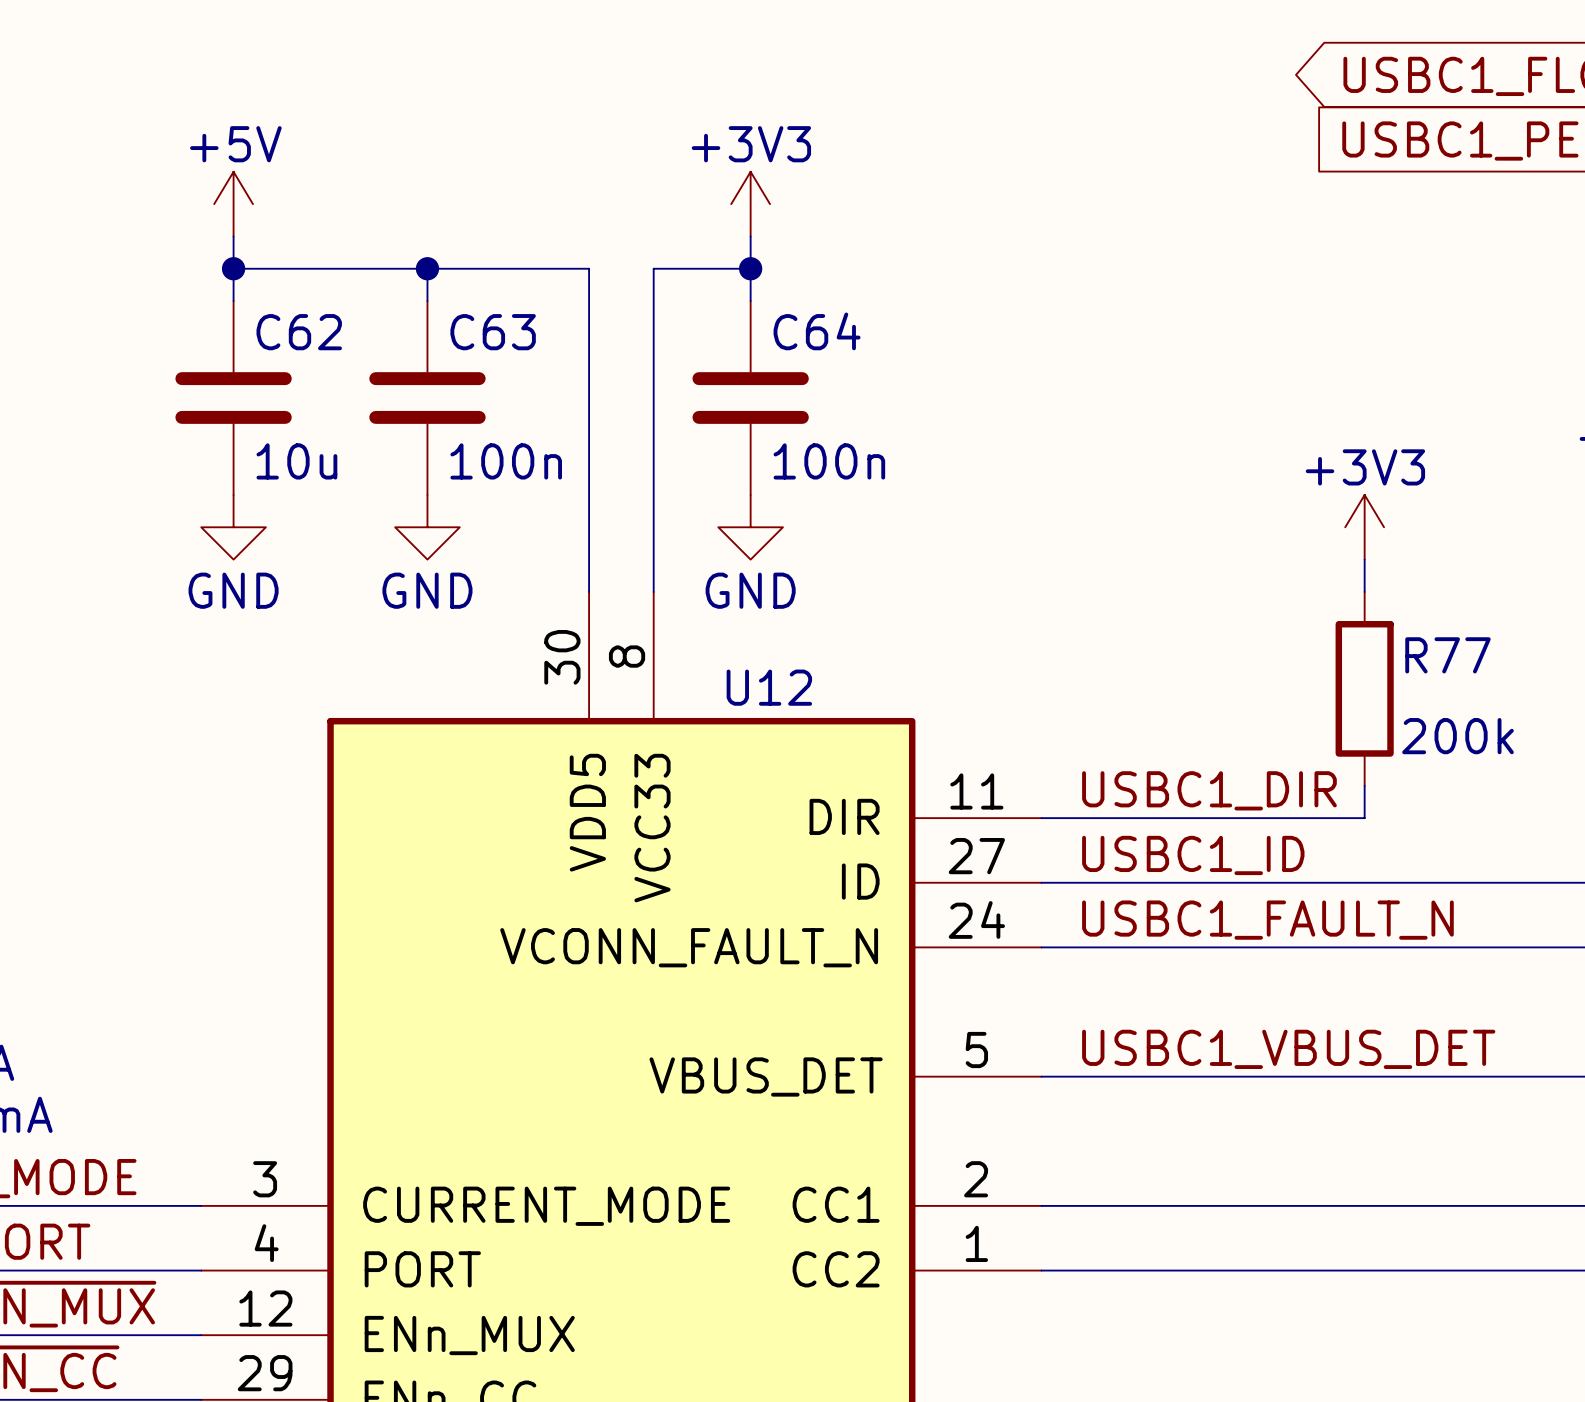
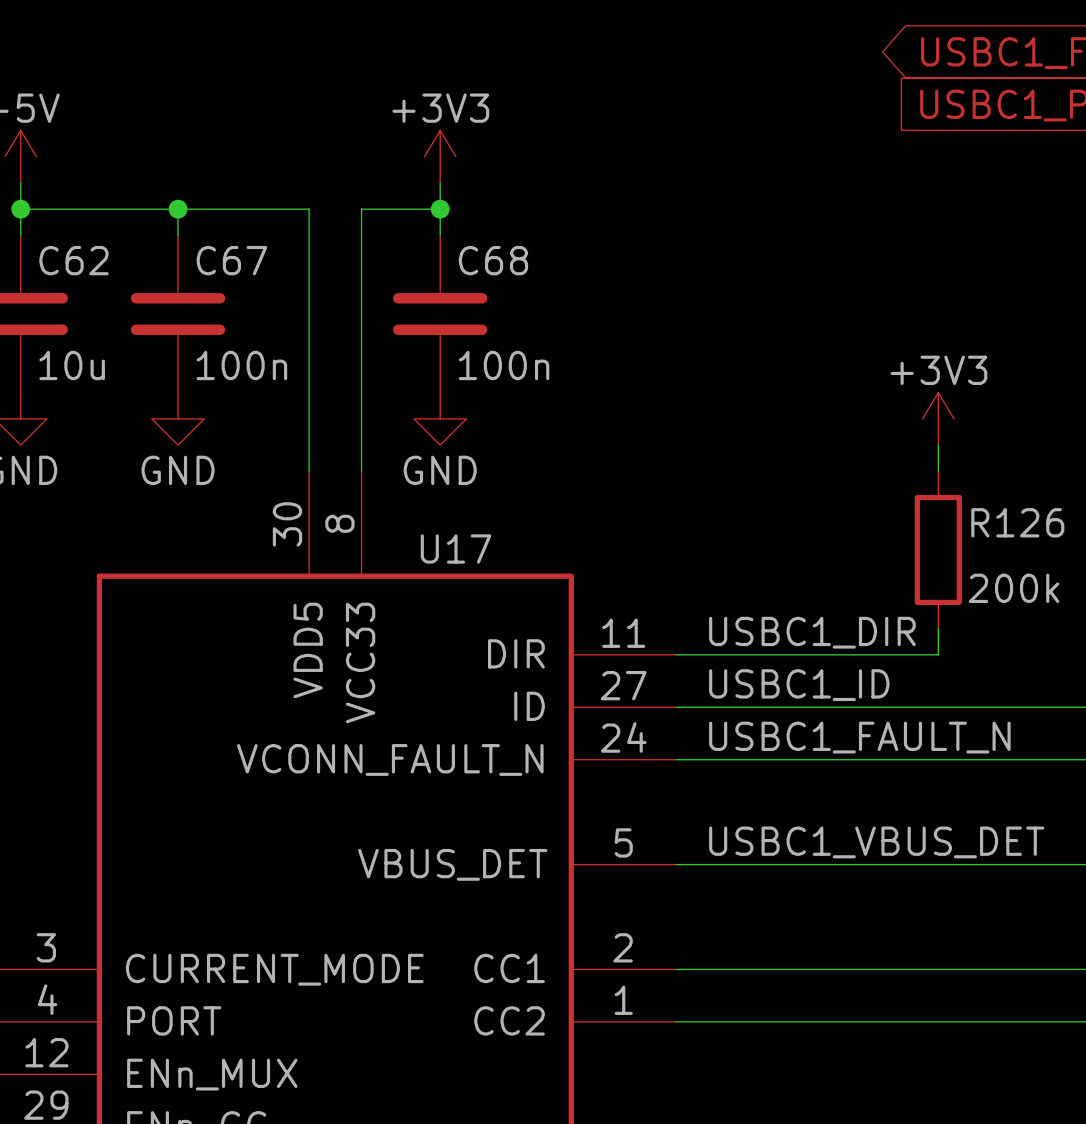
C64 name: C64 (817, 331) -> C68 (493, 260)
C63 name: C63 (493, 332) -> C67 (231, 260)
R77 name: R77 (1447, 655) -> R126 (1017, 522)
U12 name: U12 (769, 687) -> U17 (456, 549)

